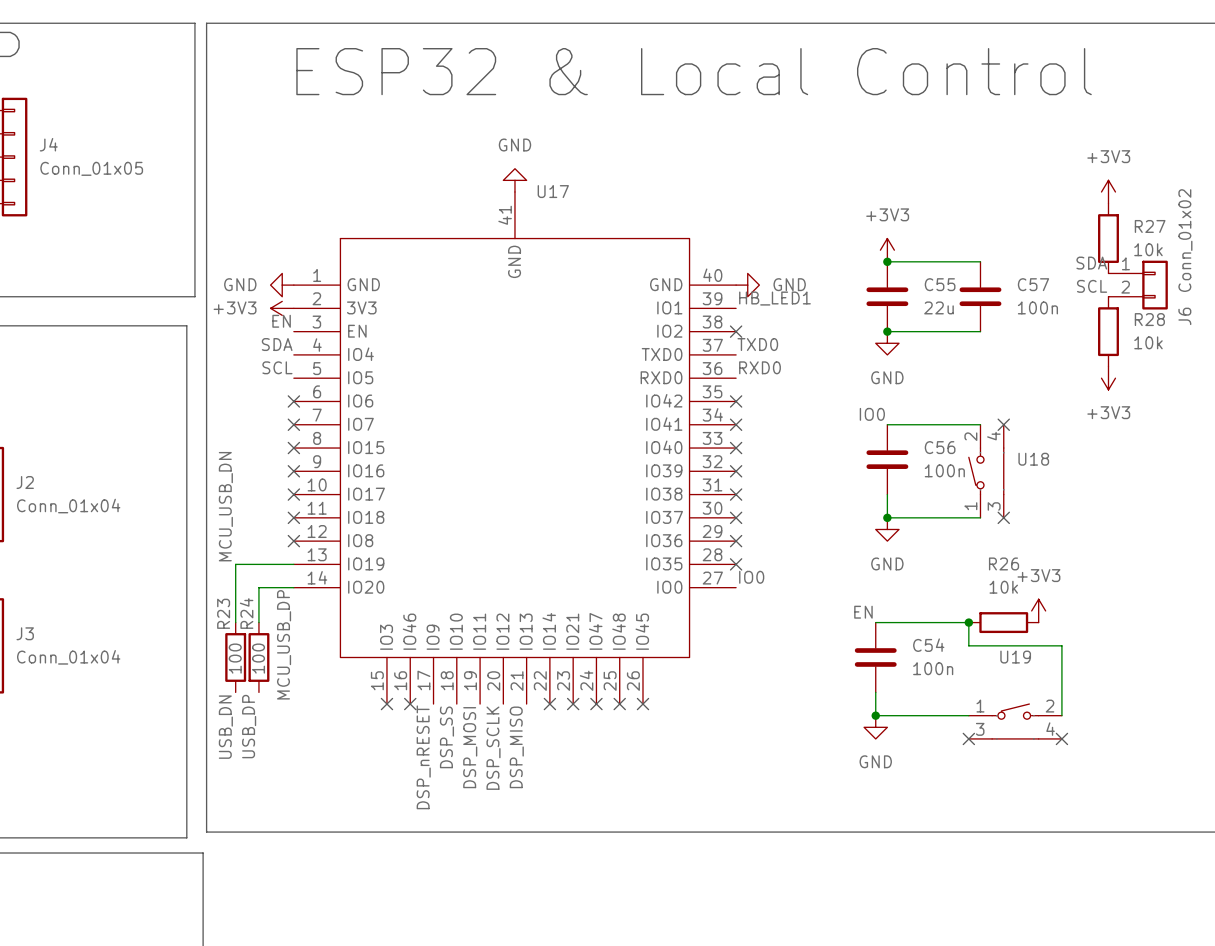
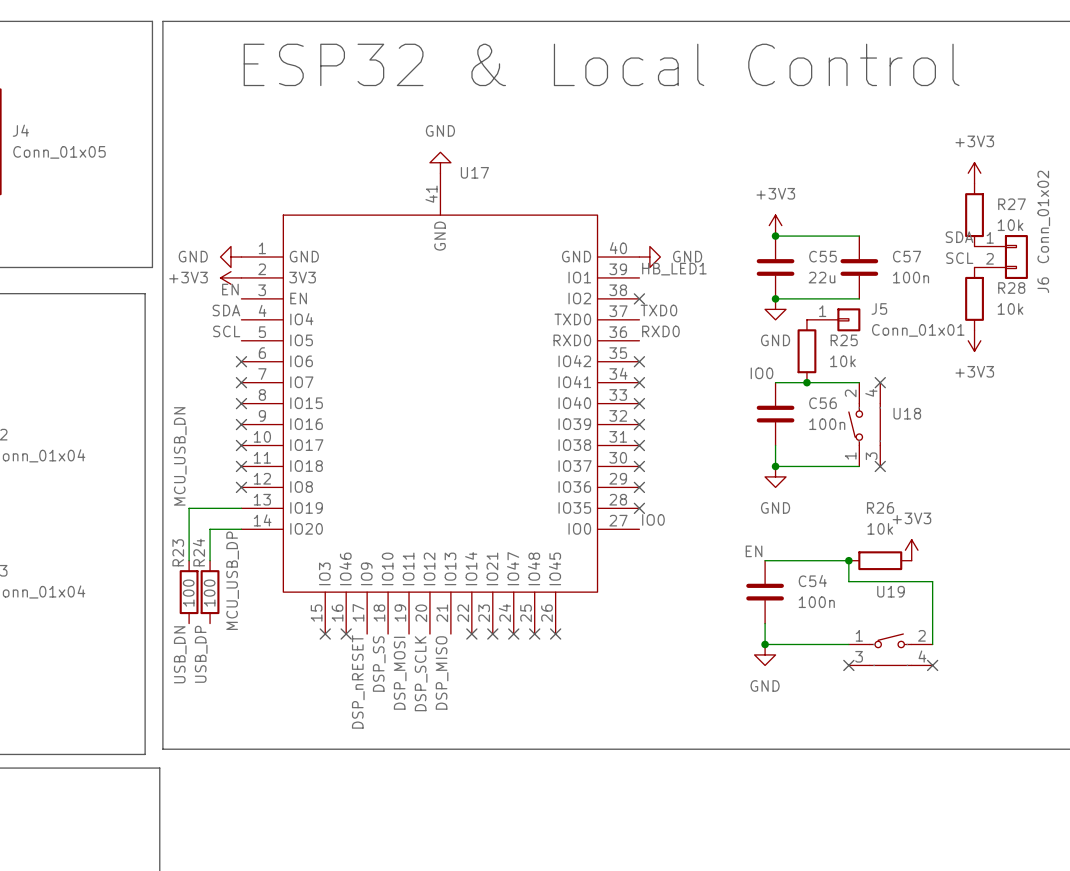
J5: none -> Conn_01x01 (833, 319)
R25: none -> 10k (806, 351)
junction: none -> (806, 382)

